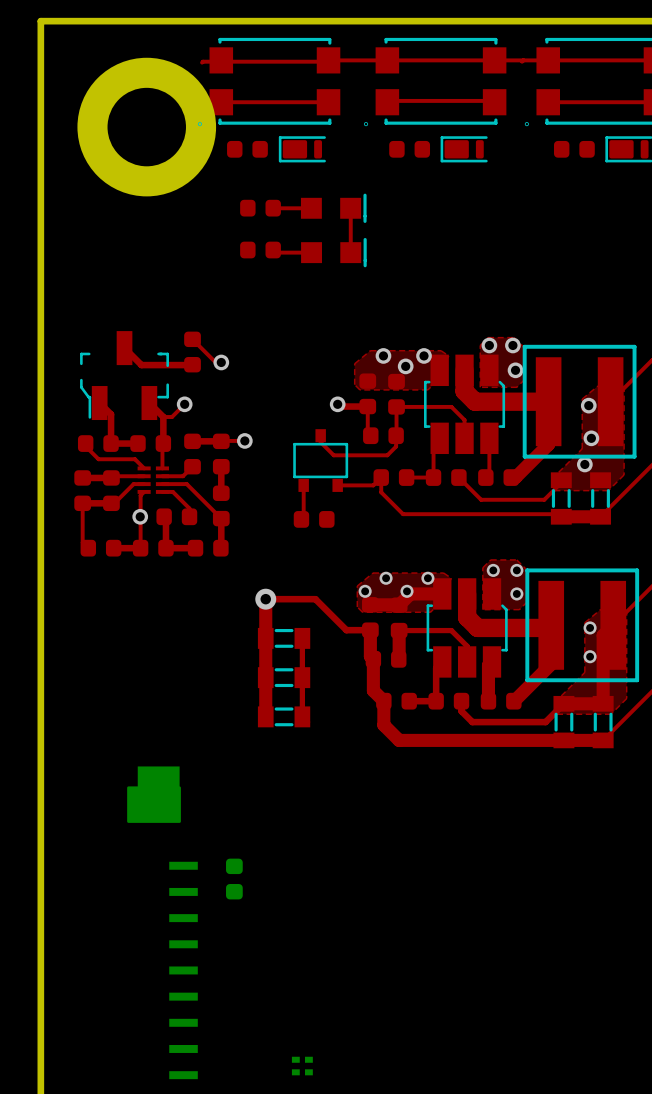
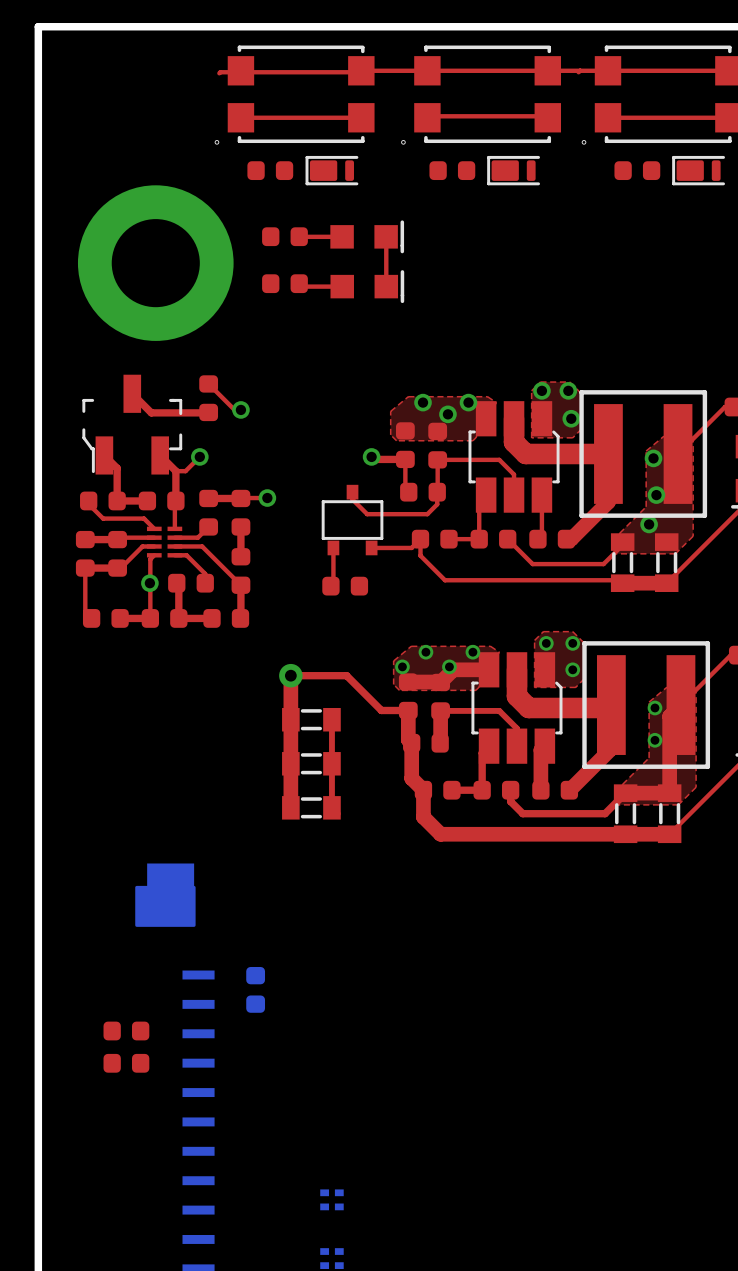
part position: (146, 127) -> (155, 263)
part: none -> (126, 1031)
part: none -> (126, 1063)

